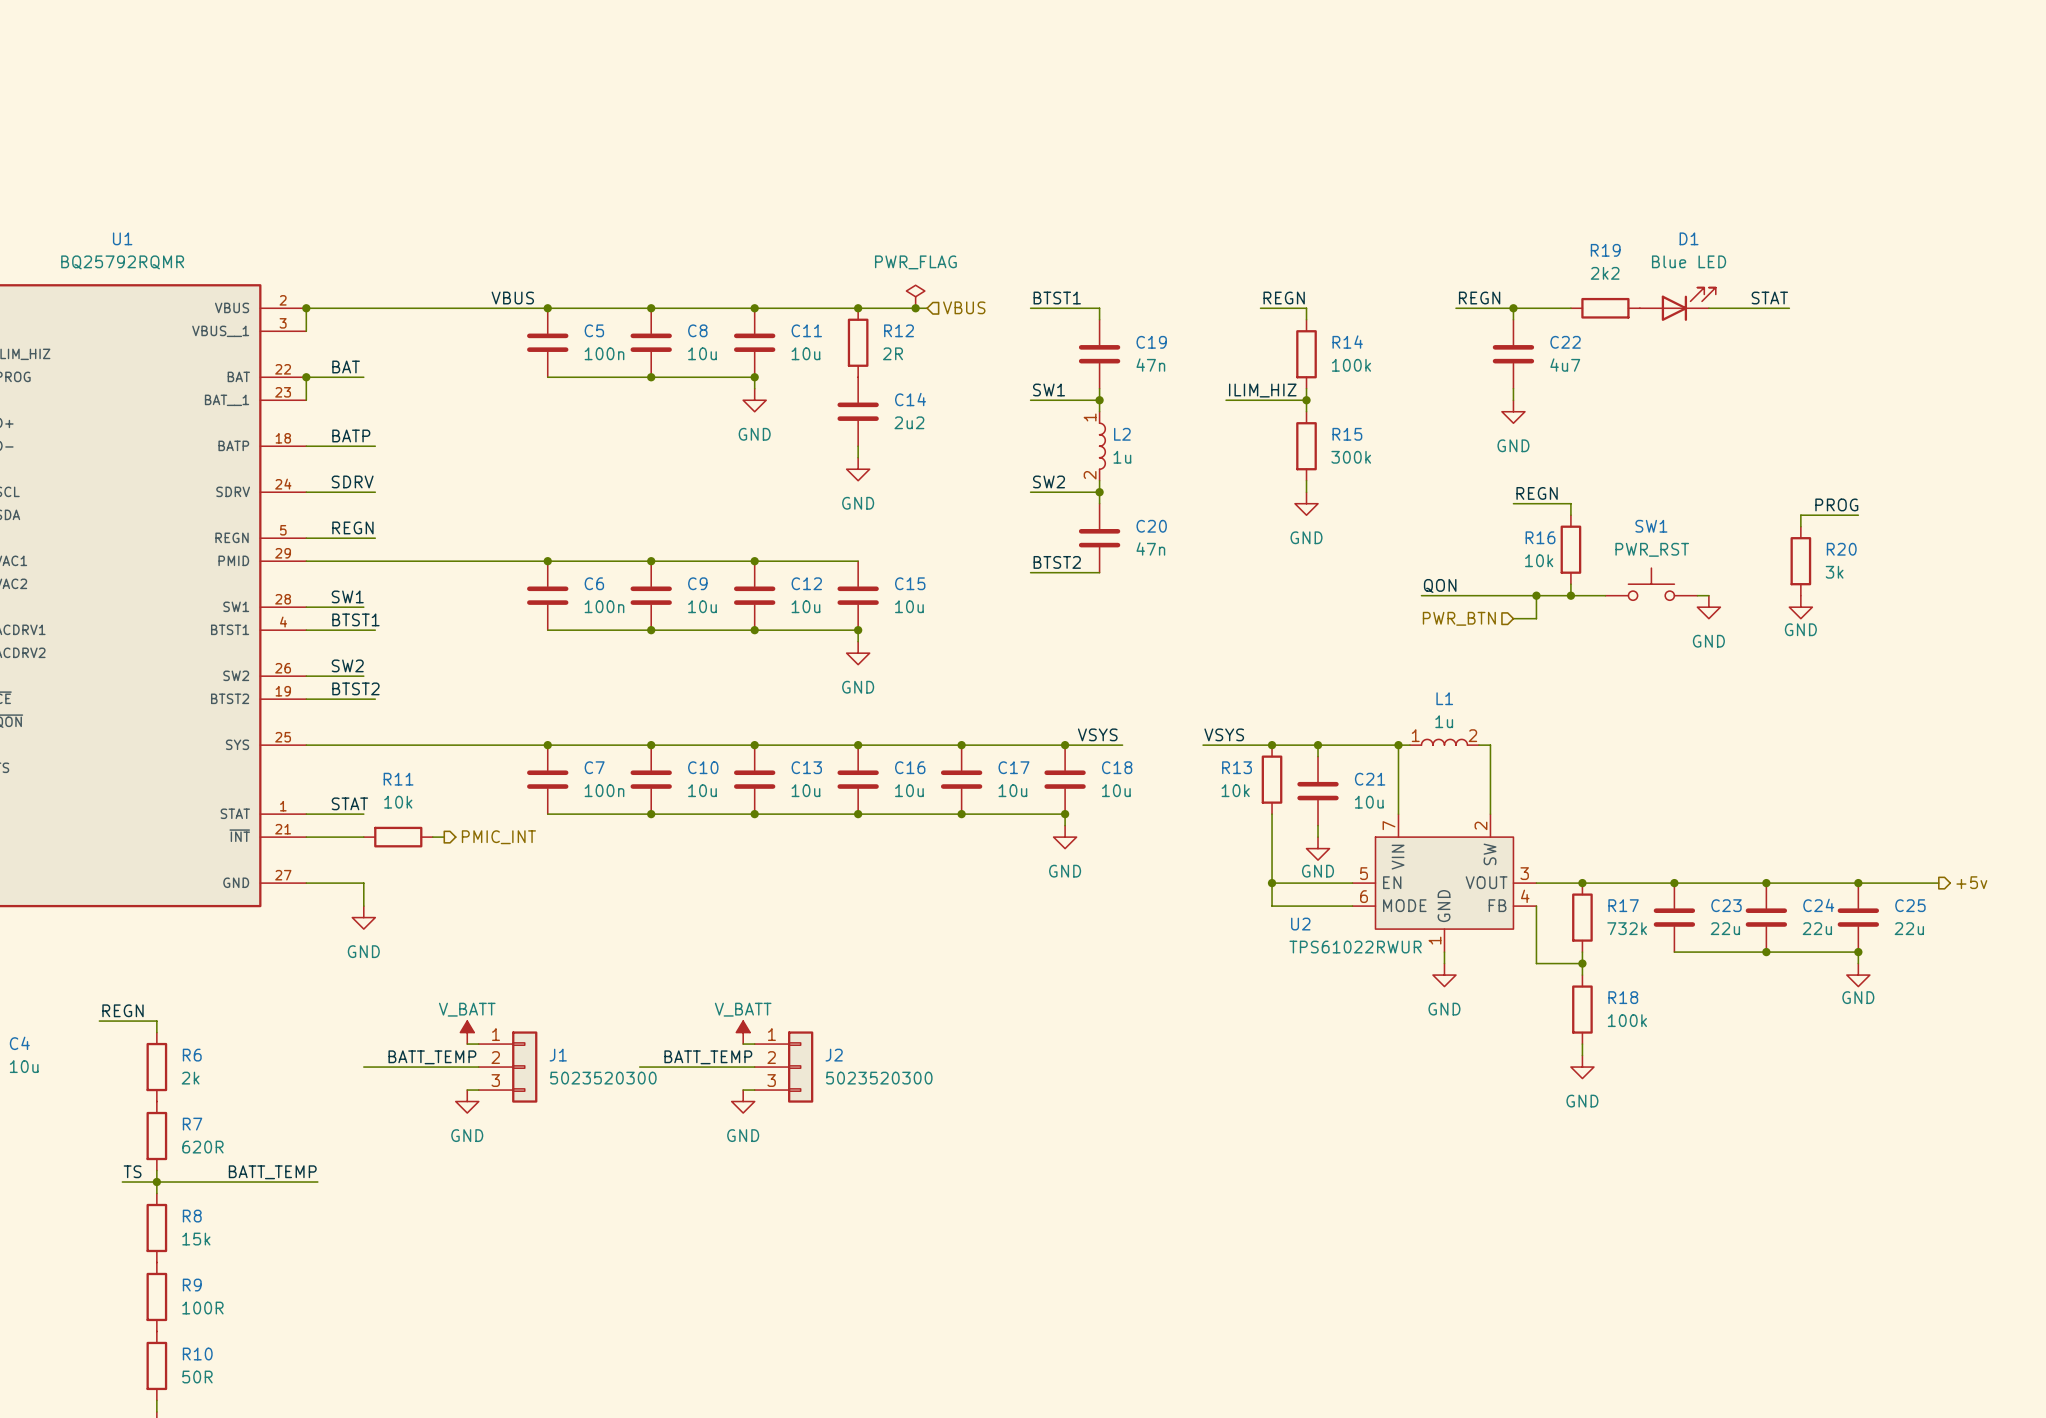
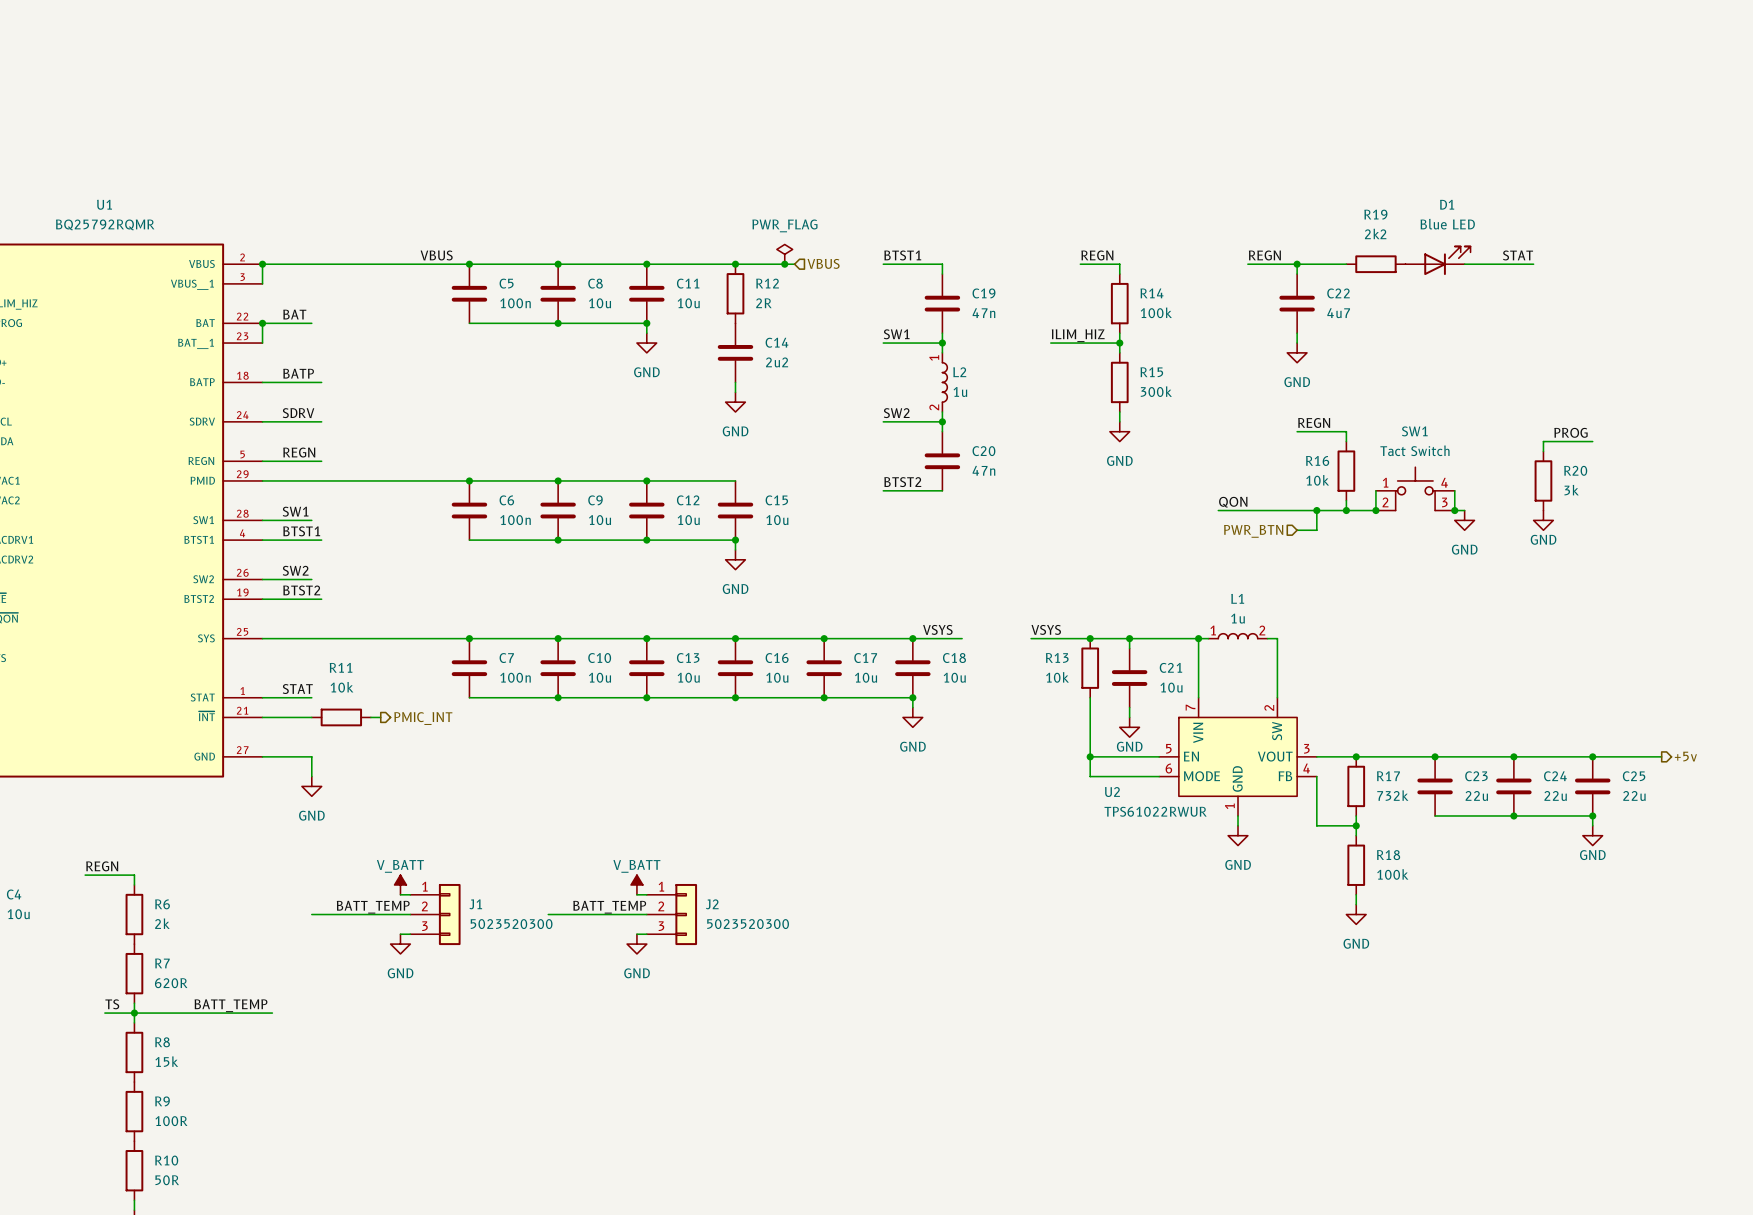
SW1 value: PWR_RST (1652, 549) -> Tact Switch (1414, 450)
SW1 symbol: [1605, 568, 1698, 601] -> [1375, 467, 1455, 511]
wire: none -> (1375, 490) (1375, 510)
wire: none -> (1454, 490) (1454, 510)
junction: none -> (1375, 510)
junction: none -> (1454, 510)

